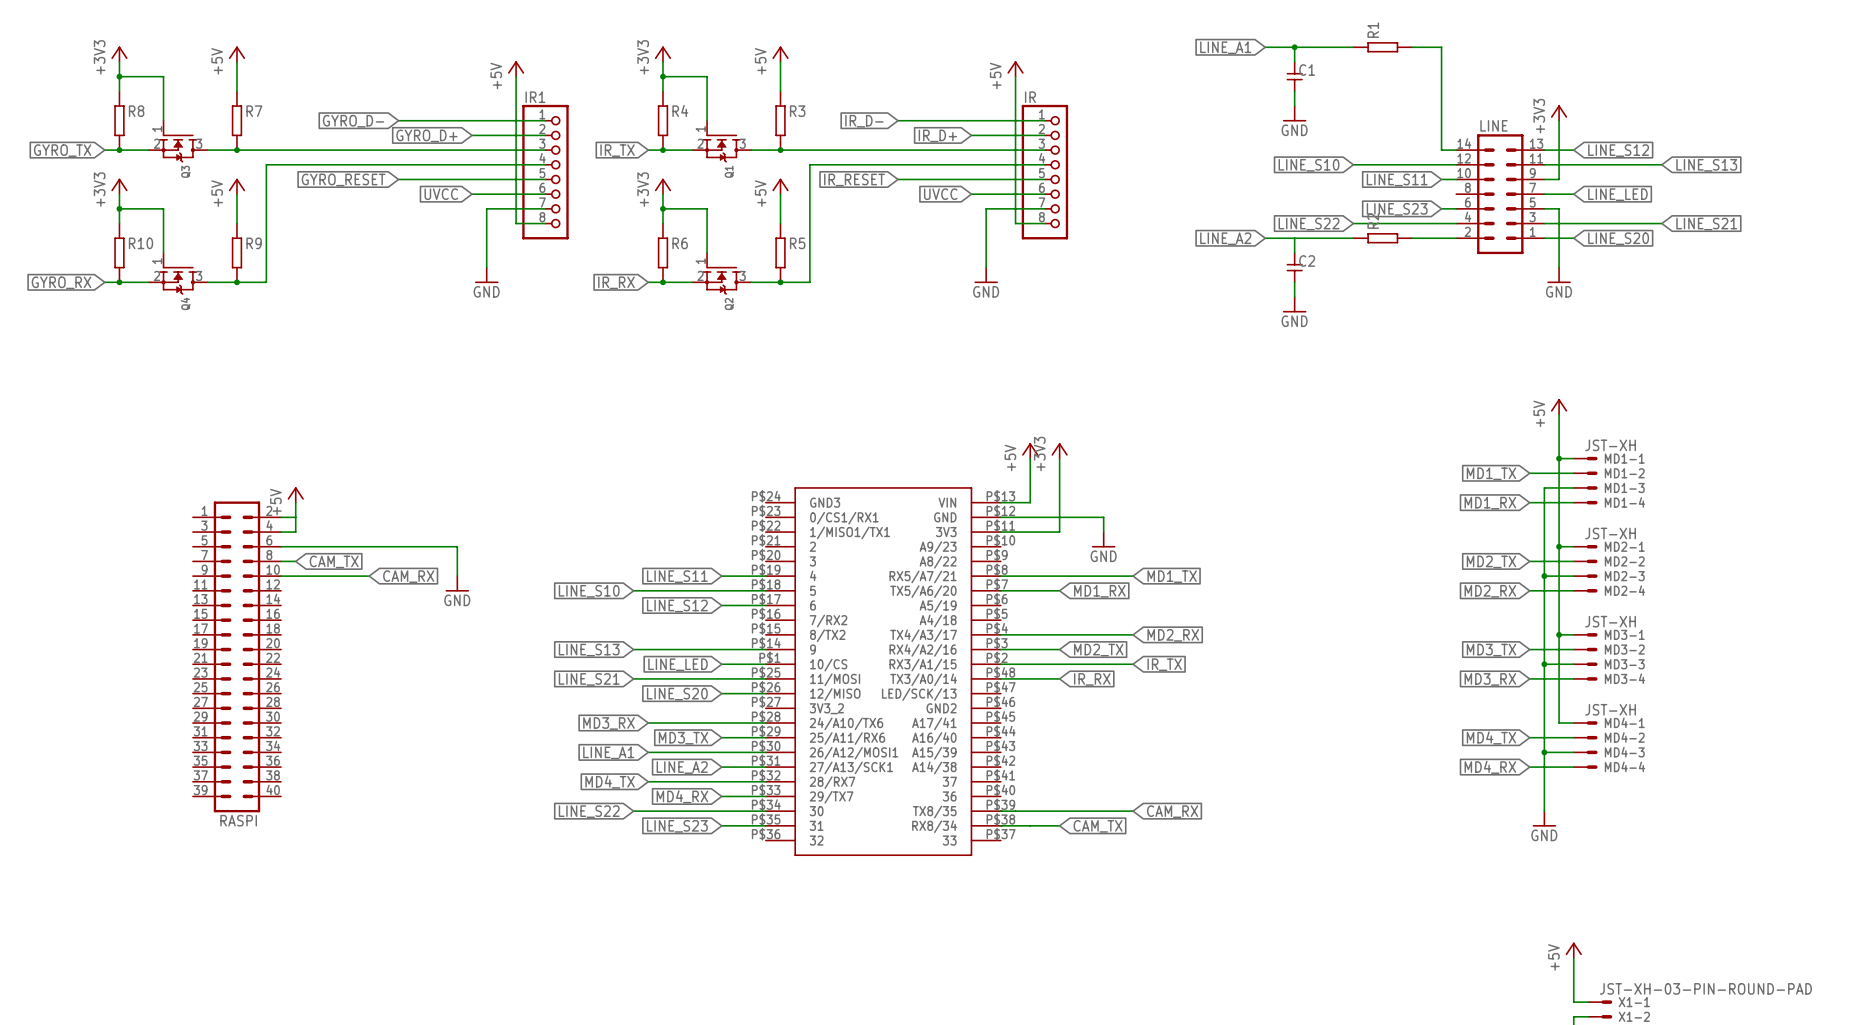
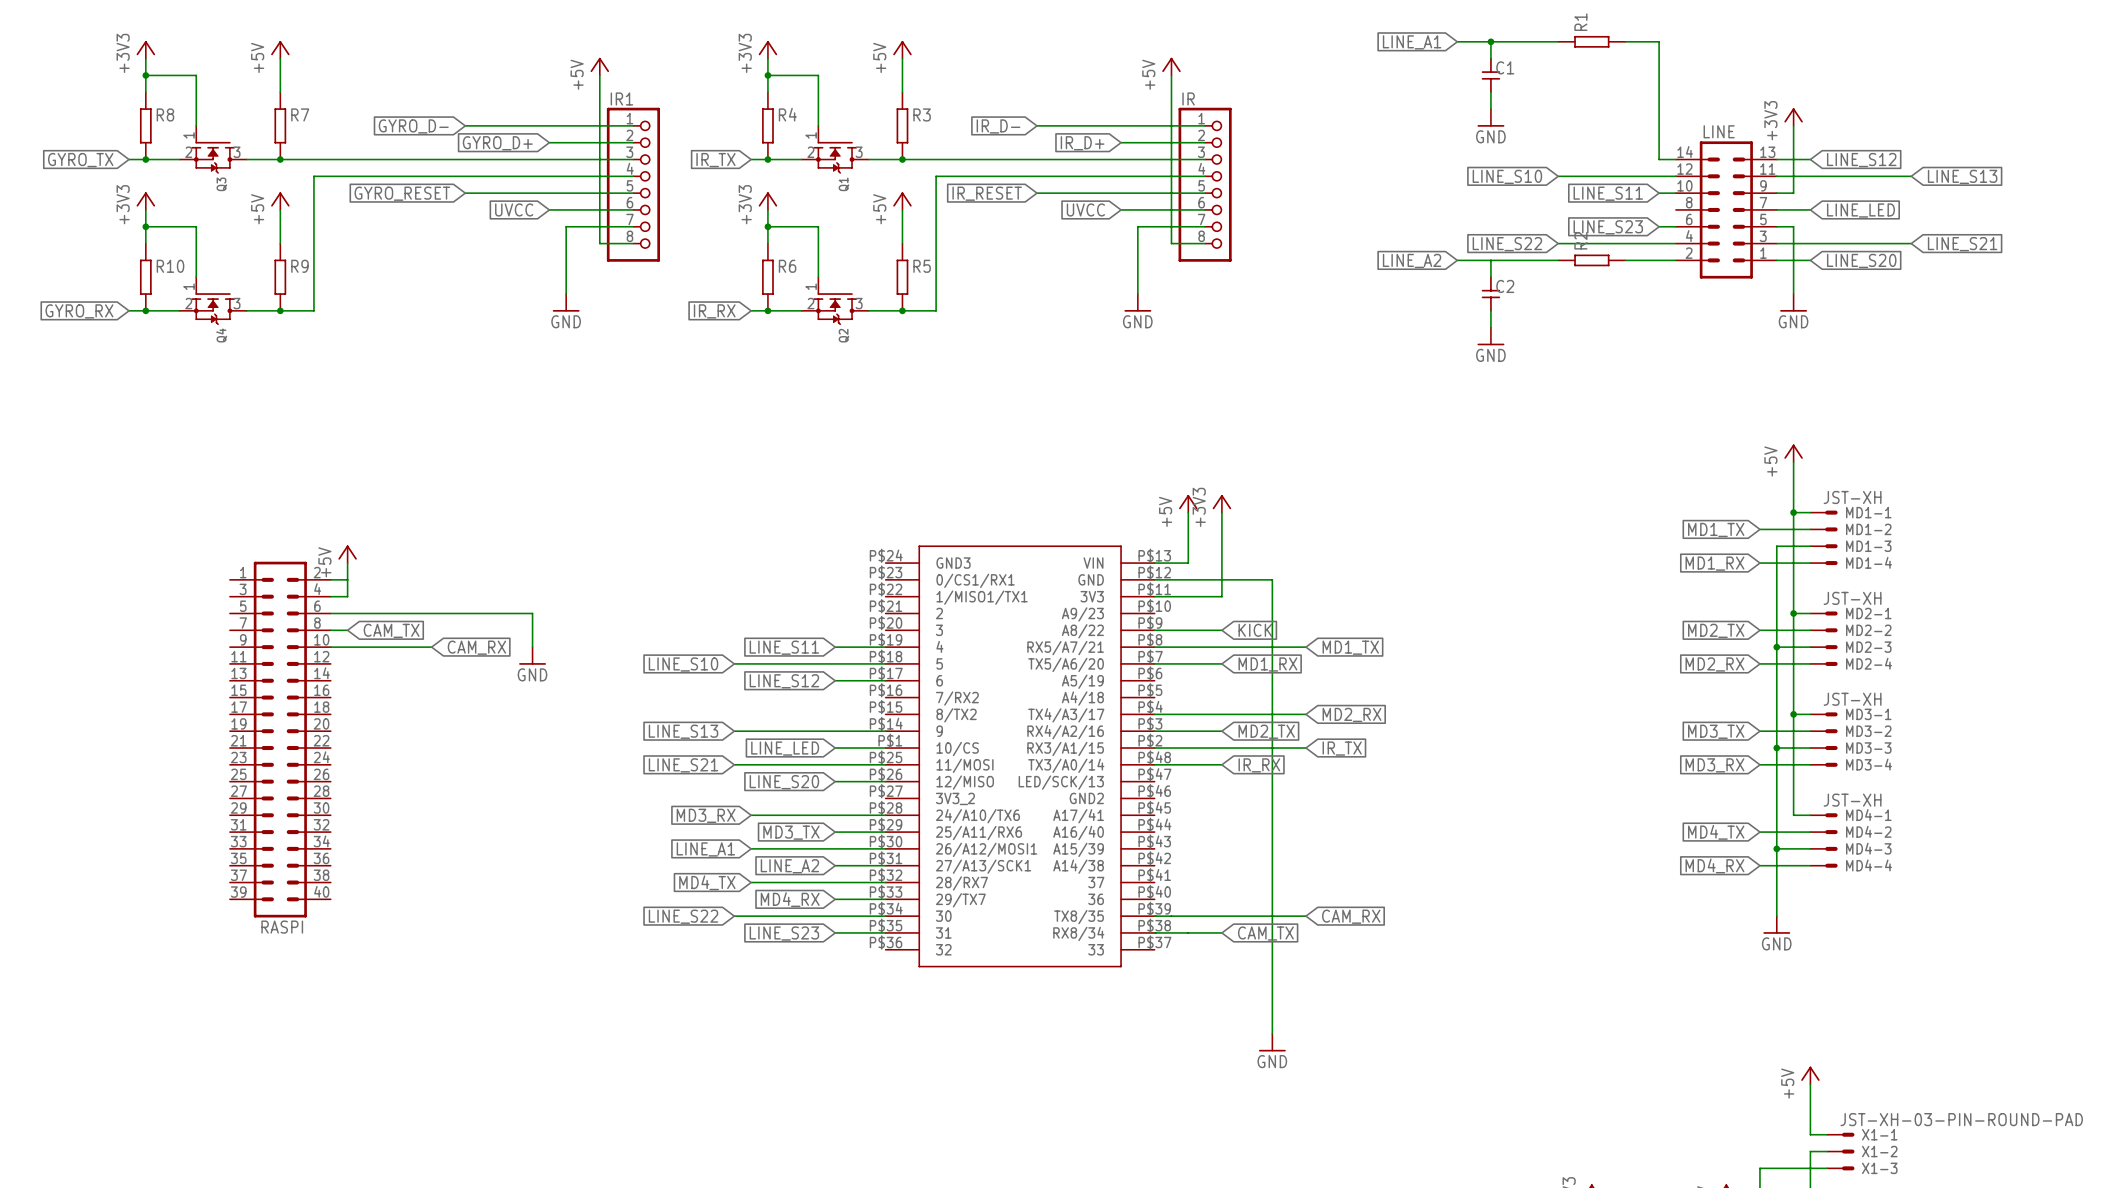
wire: none -> (1272, 596) (1272, 1033)
power symbol: GND (1103, 539) -> none
wire: none -> (1154, 630) (1221, 630)
global label: none -> KICK (1255, 630)
power symbol: none -> GND (1272, 1042)

